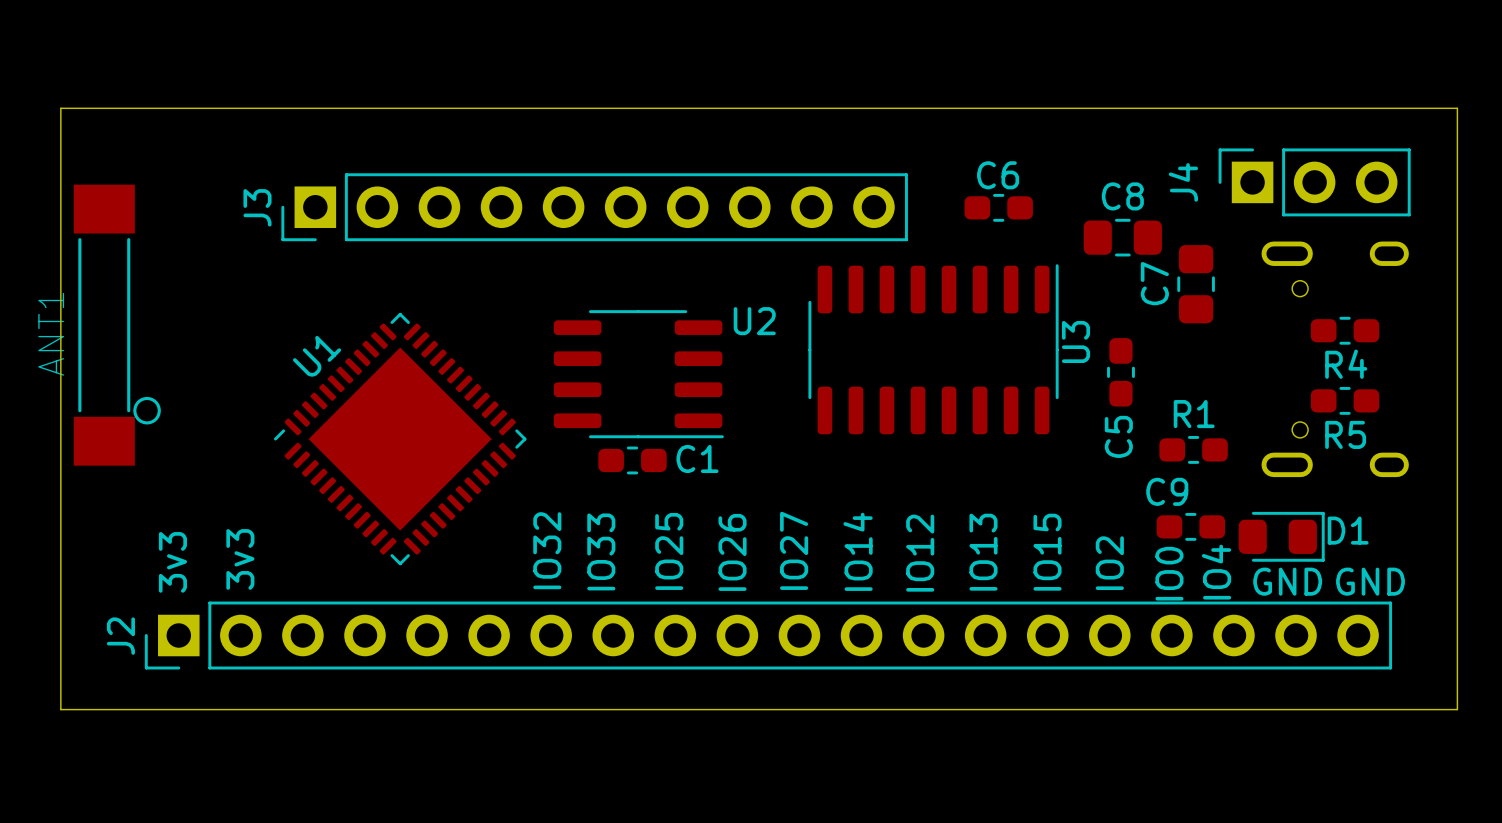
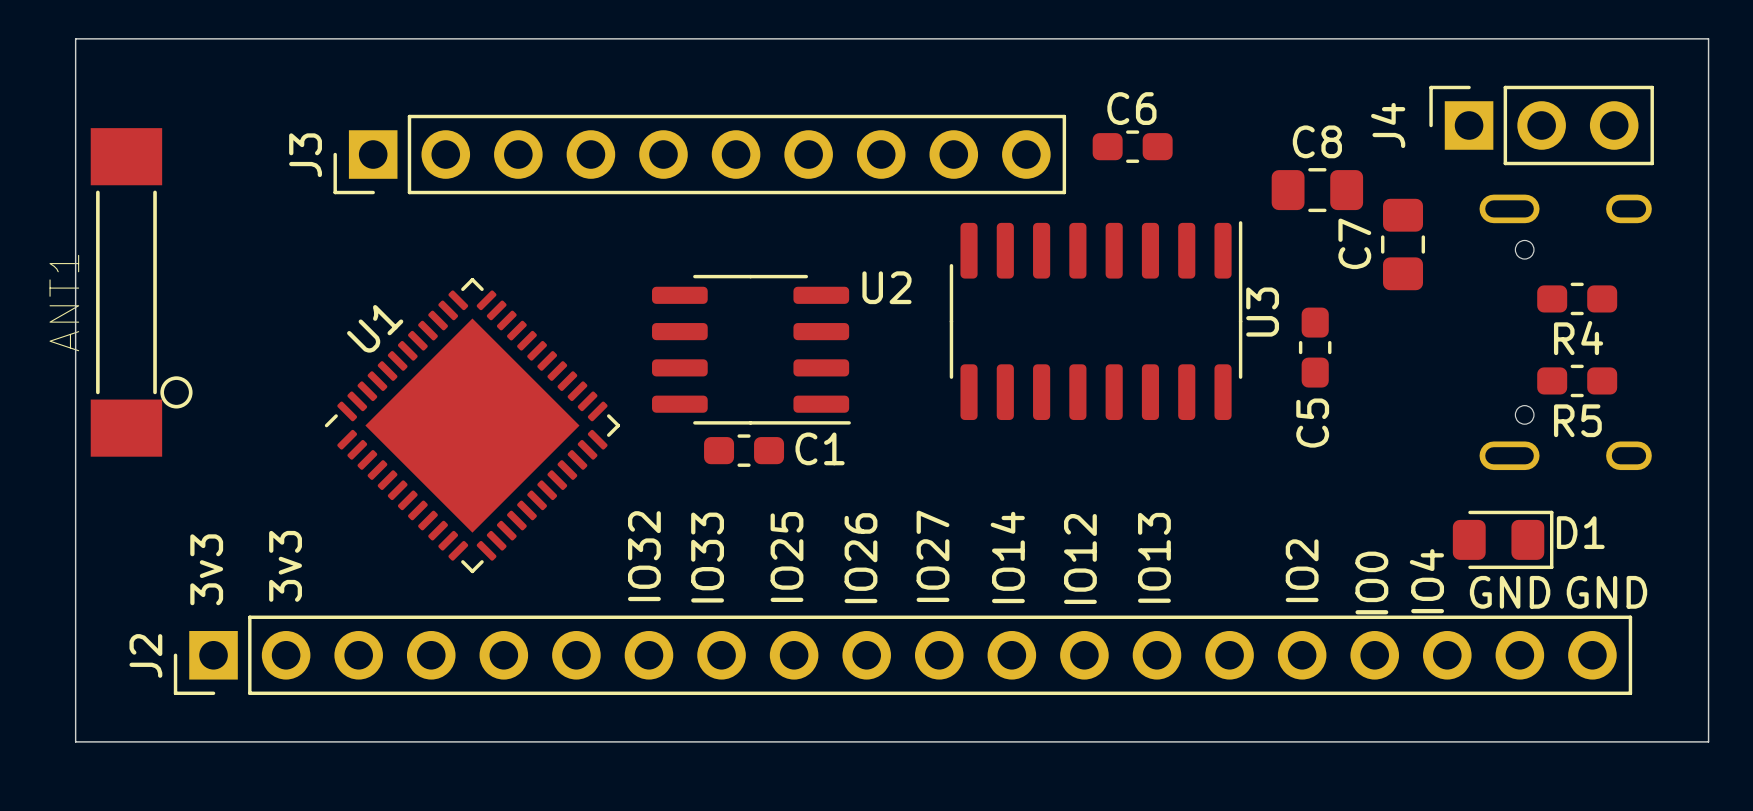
C6 position: (998, 207) -> (1132, 146)
R1: (1193, 449) -> none
C9: (1190, 526) -> none
text: IO15 (1047, 552) -> none

